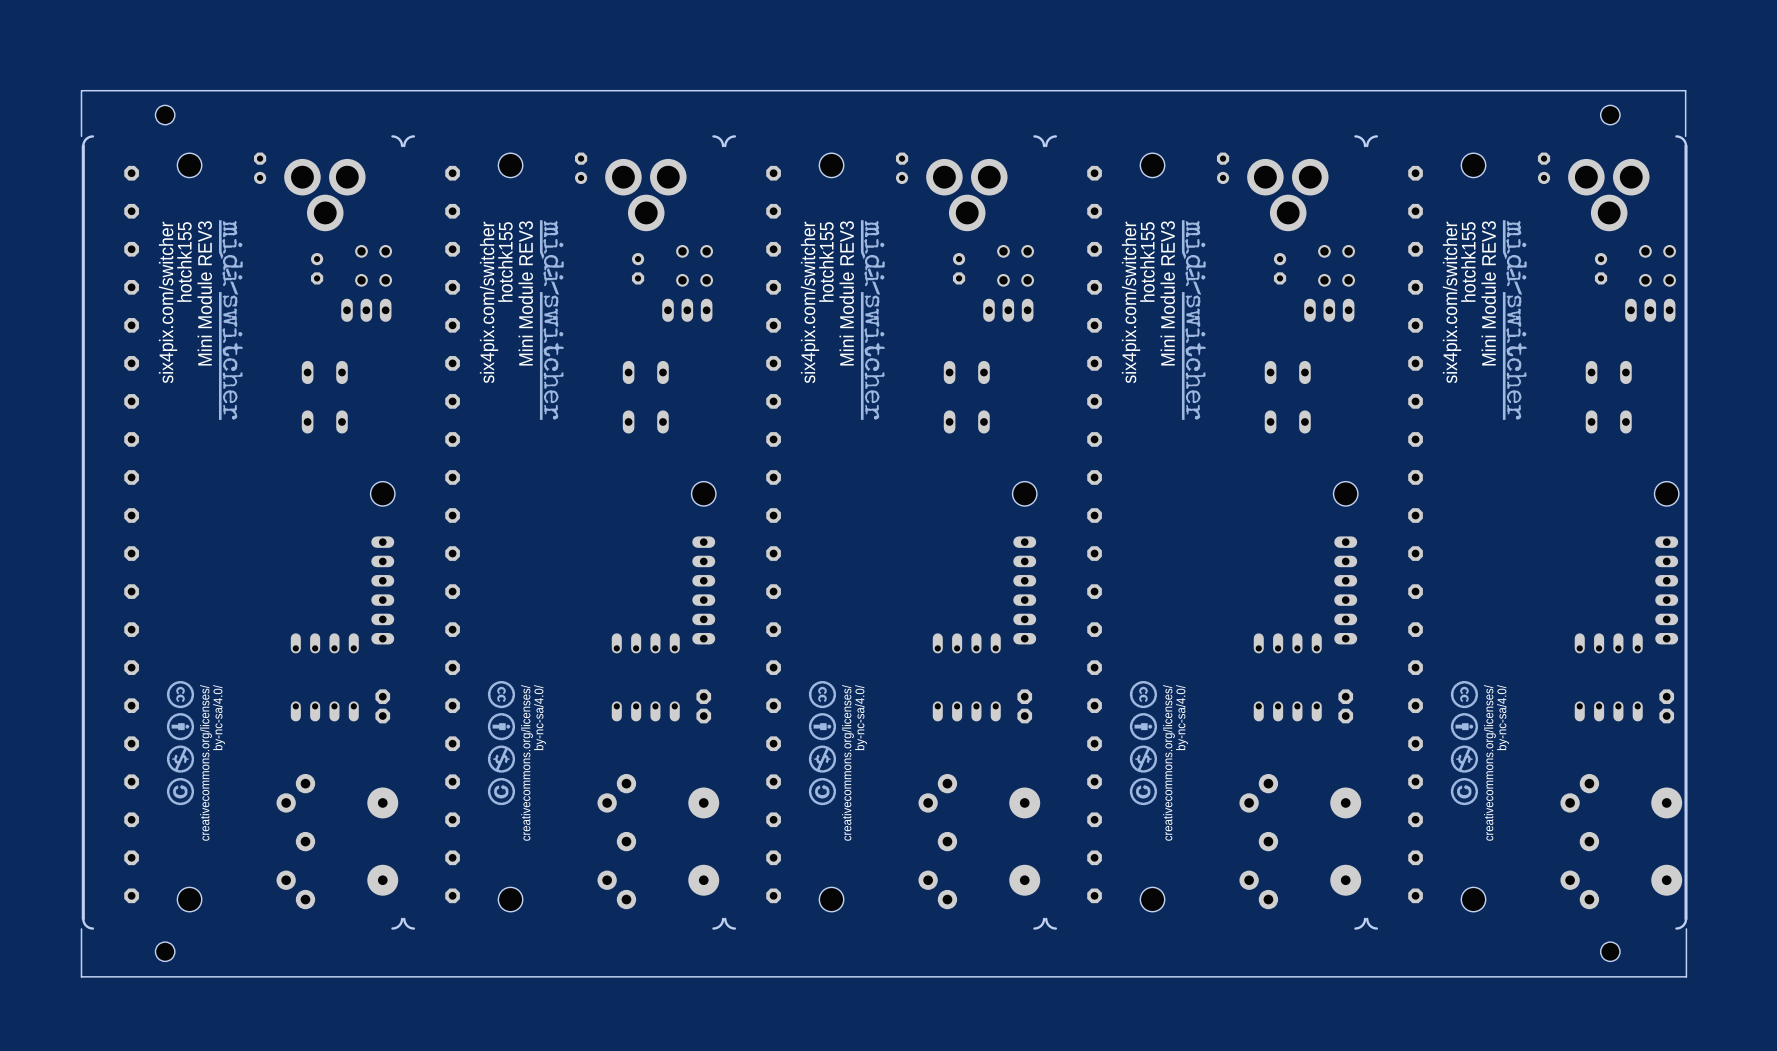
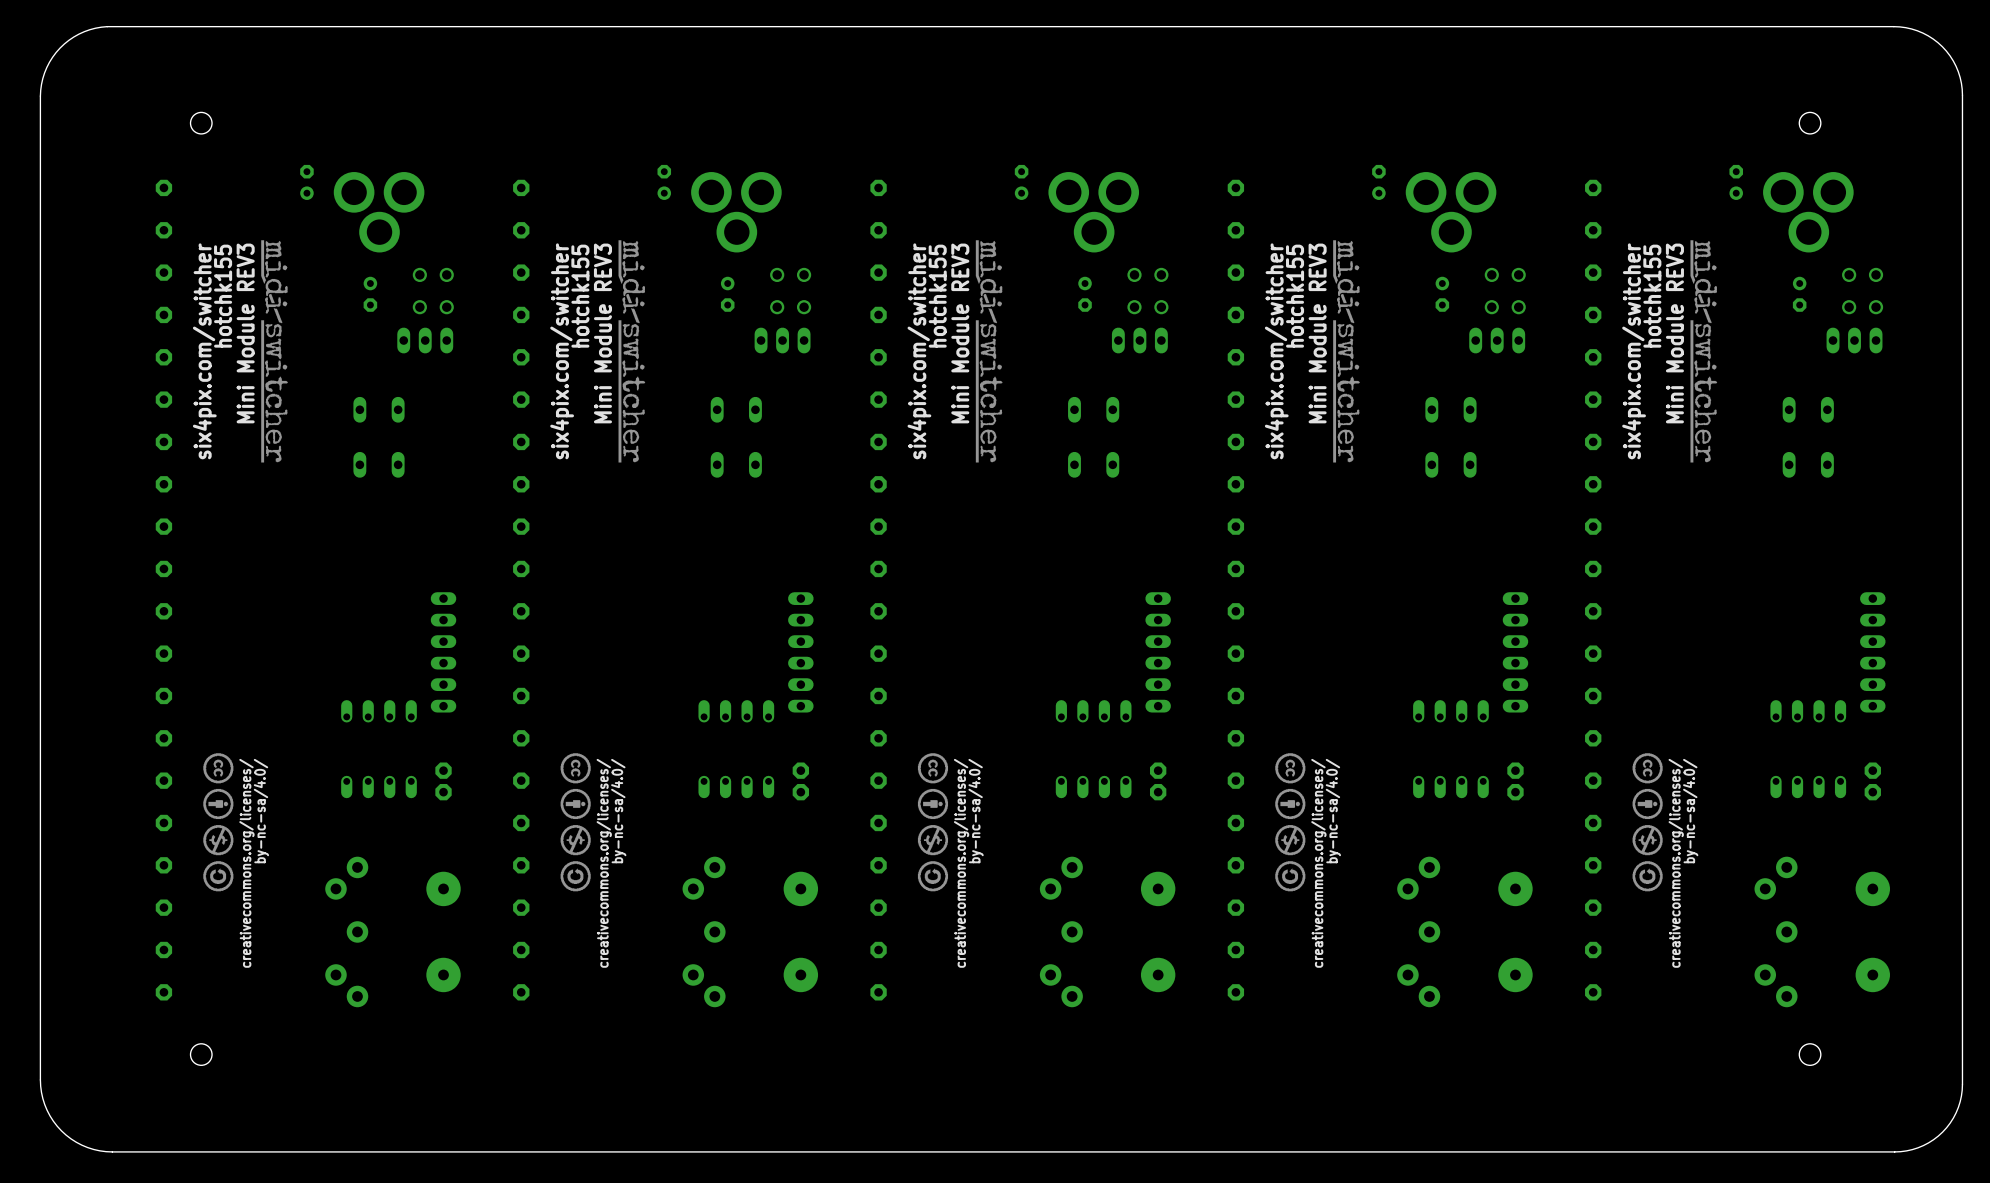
board edge: none -> (1893, 26) (107, 26) (89, 29) (73, 37) (60, 48) (49, 62) (42, 78) (40, 96) (40, 1079) (42, 1098) (50, 1115) (61, 1130) (76, 1142) (93, 1149) (112, 1151) (1894, 1151) (1912, 1149) (1928, 1142) (1942, 1132) (1953, 1118) (1960, 1101) (1962, 1084) (1962, 95) (1958, 71) (1953, 60) (1942, 46) (1928, 35) (1917, 30) (1893, 26)
board edge: (81, 90) (81, 136) -> none
board edge: (82, 90) (1685, 90) (1685, 136) -> none
board edge: (92, 136) (86, 139) (83, 146) (83, 918) (86, 925) (92, 928) -> none
board edge: (392, 136) (399, 139) (402, 146) -> none
board edge: (413, 136) (407, 139) (404, 146) -> none
board edge: (713, 136) (720, 139) (723, 146) -> none
board edge: (734, 136) (728, 139) (725, 146) -> none
board edge: (1034, 136) (1041, 139) (1044, 146) -> none
board edge: (1055, 136) (1049, 139) (1046, 146) -> none
board edge: (1355, 136) (1362, 139) (1365, 146) -> none
board edge: (1376, 136) (1370, 139) (1367, 146) -> none
board edge: (1676, 136) (1683, 139) (1686, 146) (1686, 918) (1683, 925) (1676, 928) -> none
hole: (189, 165) -> none
hole: (510, 165) -> none
hole: (831, 165) -> none
hole: (1152, 165) -> none
hole: (1473, 165) -> none
hole: (382, 493) -> none
hole: (703, 493) -> none
hole: (1024, 493) -> none
hole: (1345, 493) -> none
hole: (1666, 493) -> none
hole: (189, 899) -> none
hole: (510, 899) -> none
hole: (831, 899) -> none
hole: (1152, 899) -> none
hole: (1473, 899) -> none
board edge: (402, 918) (399, 925) (392, 928) -> none
board edge: (404, 918) (407, 925) (413, 928) -> none
board edge: (723, 918) (720, 925) (713, 928) -> none
board edge: (725, 918) (728, 925) (734, 928) -> none
board edge: (1044, 918) (1041, 925) (1034, 928) -> none
board edge: (1046, 918) (1049, 925) (1055, 928) -> none
board edge: (1365, 918) (1362, 925) (1355, 928) -> none
board edge: (1367, 918) (1370, 925) (1376, 928) -> none
board edge: (1686, 928) (1686, 976) (81, 976) (81, 928) -> none

